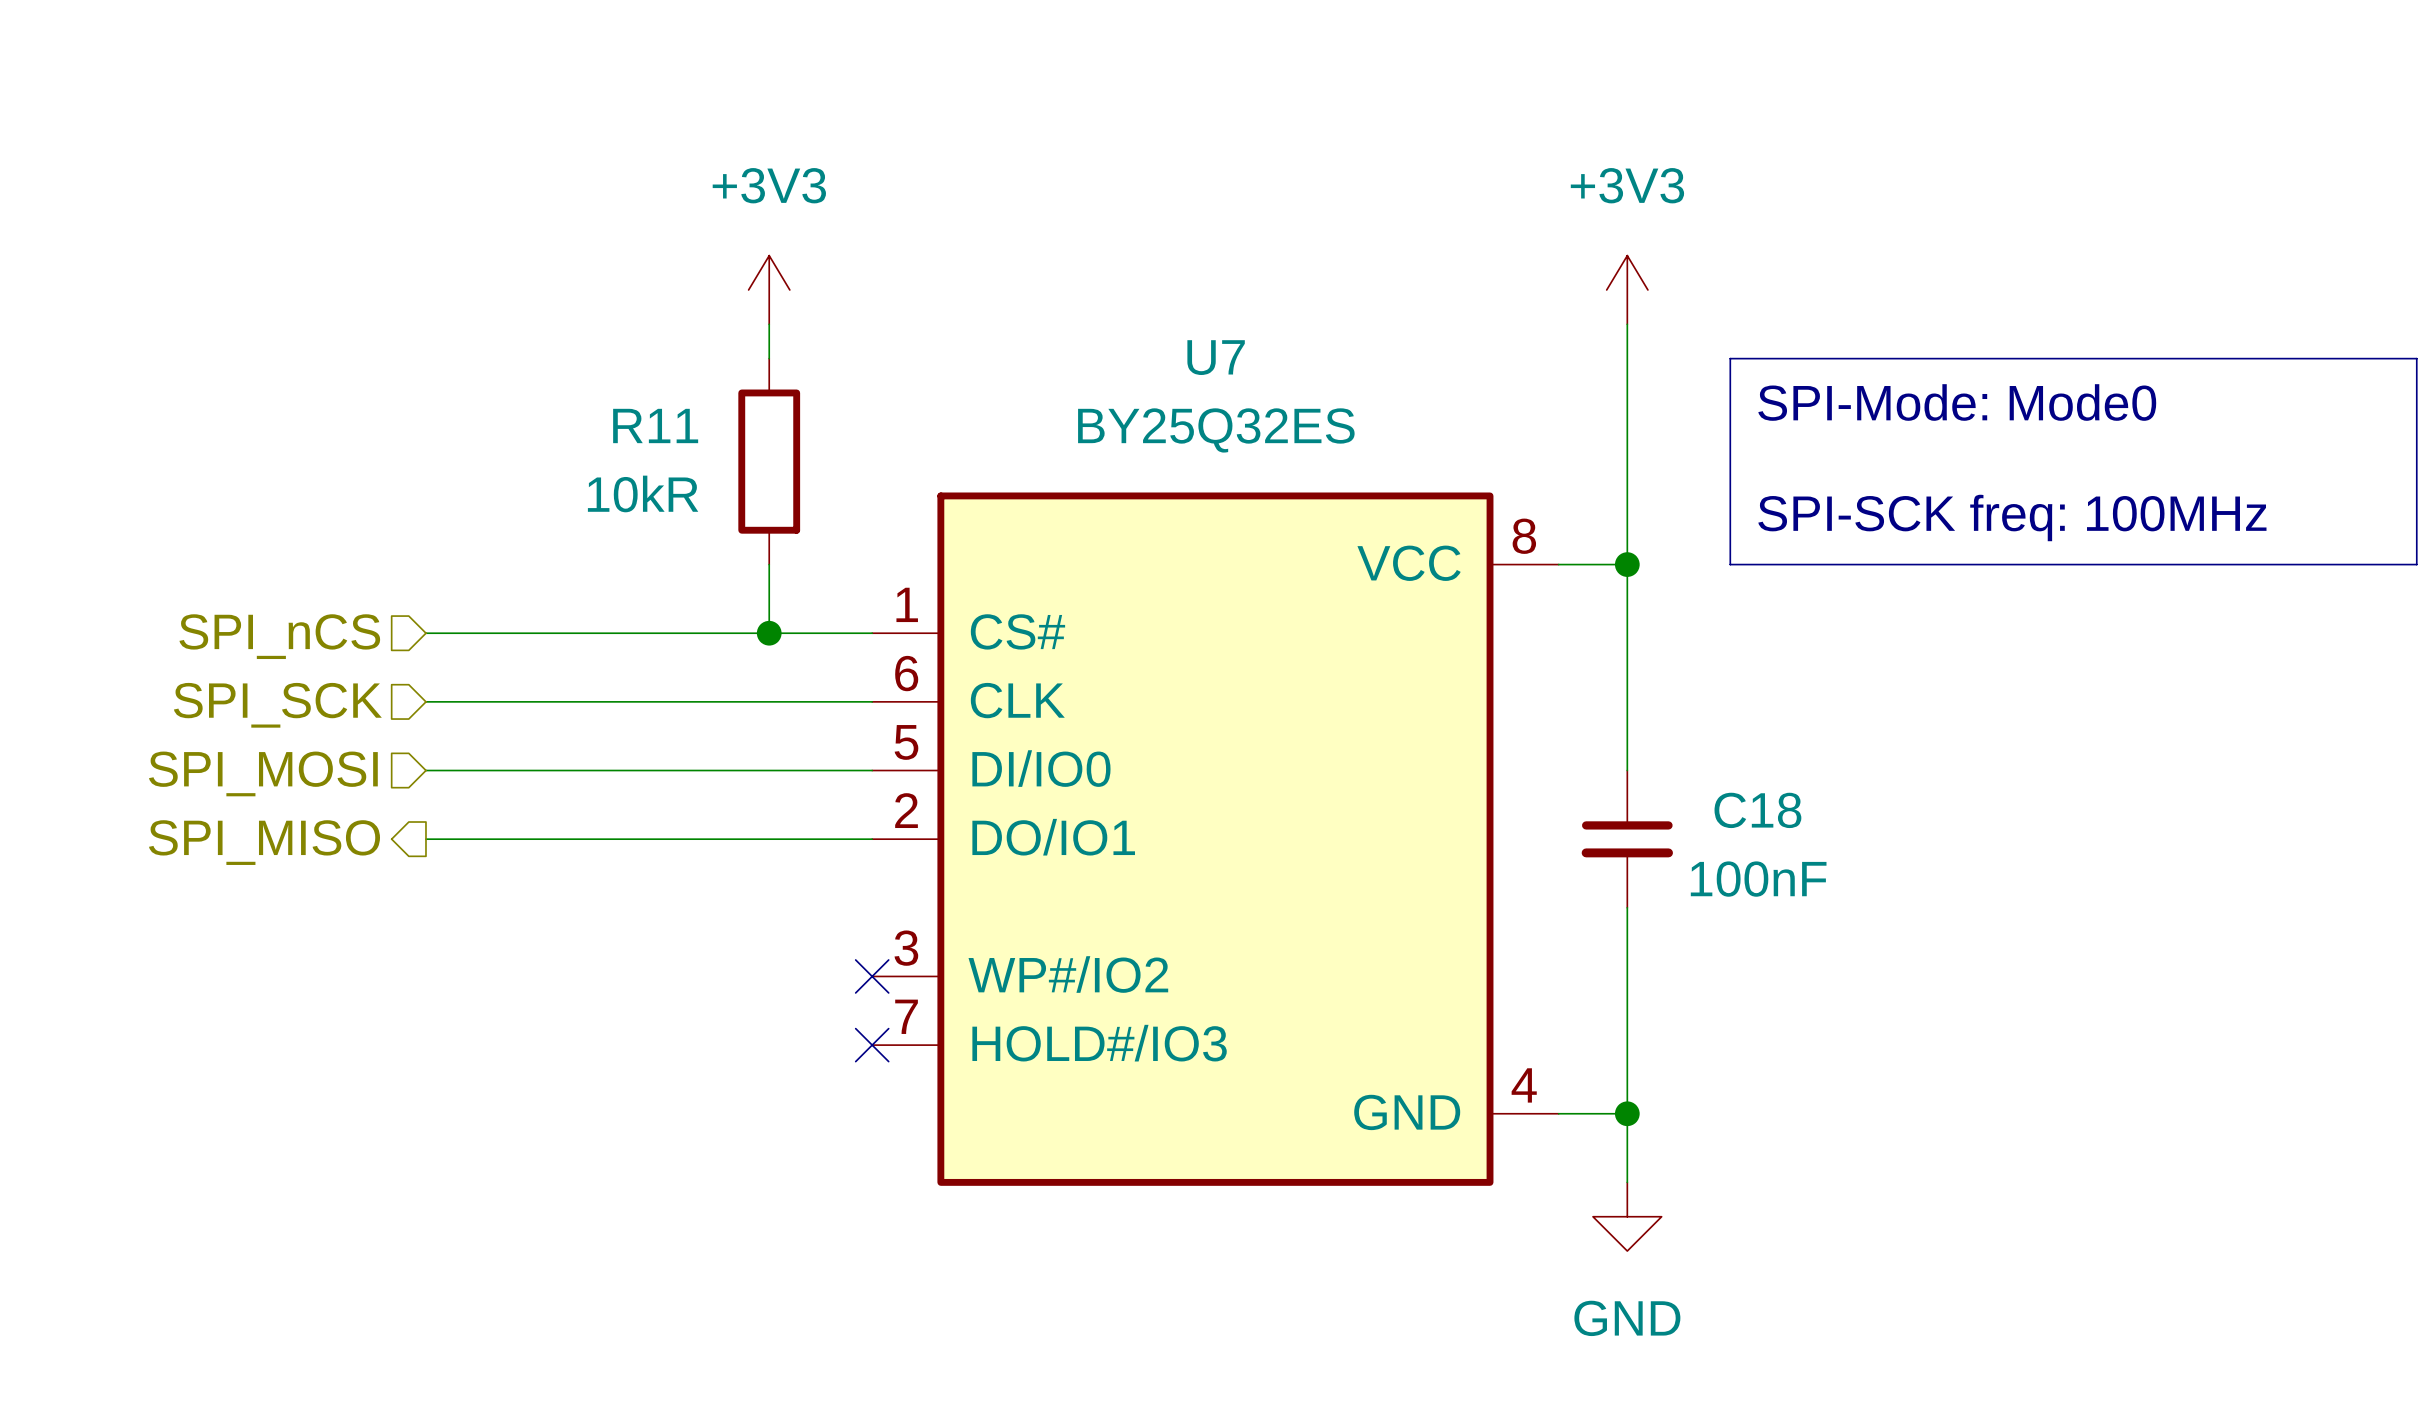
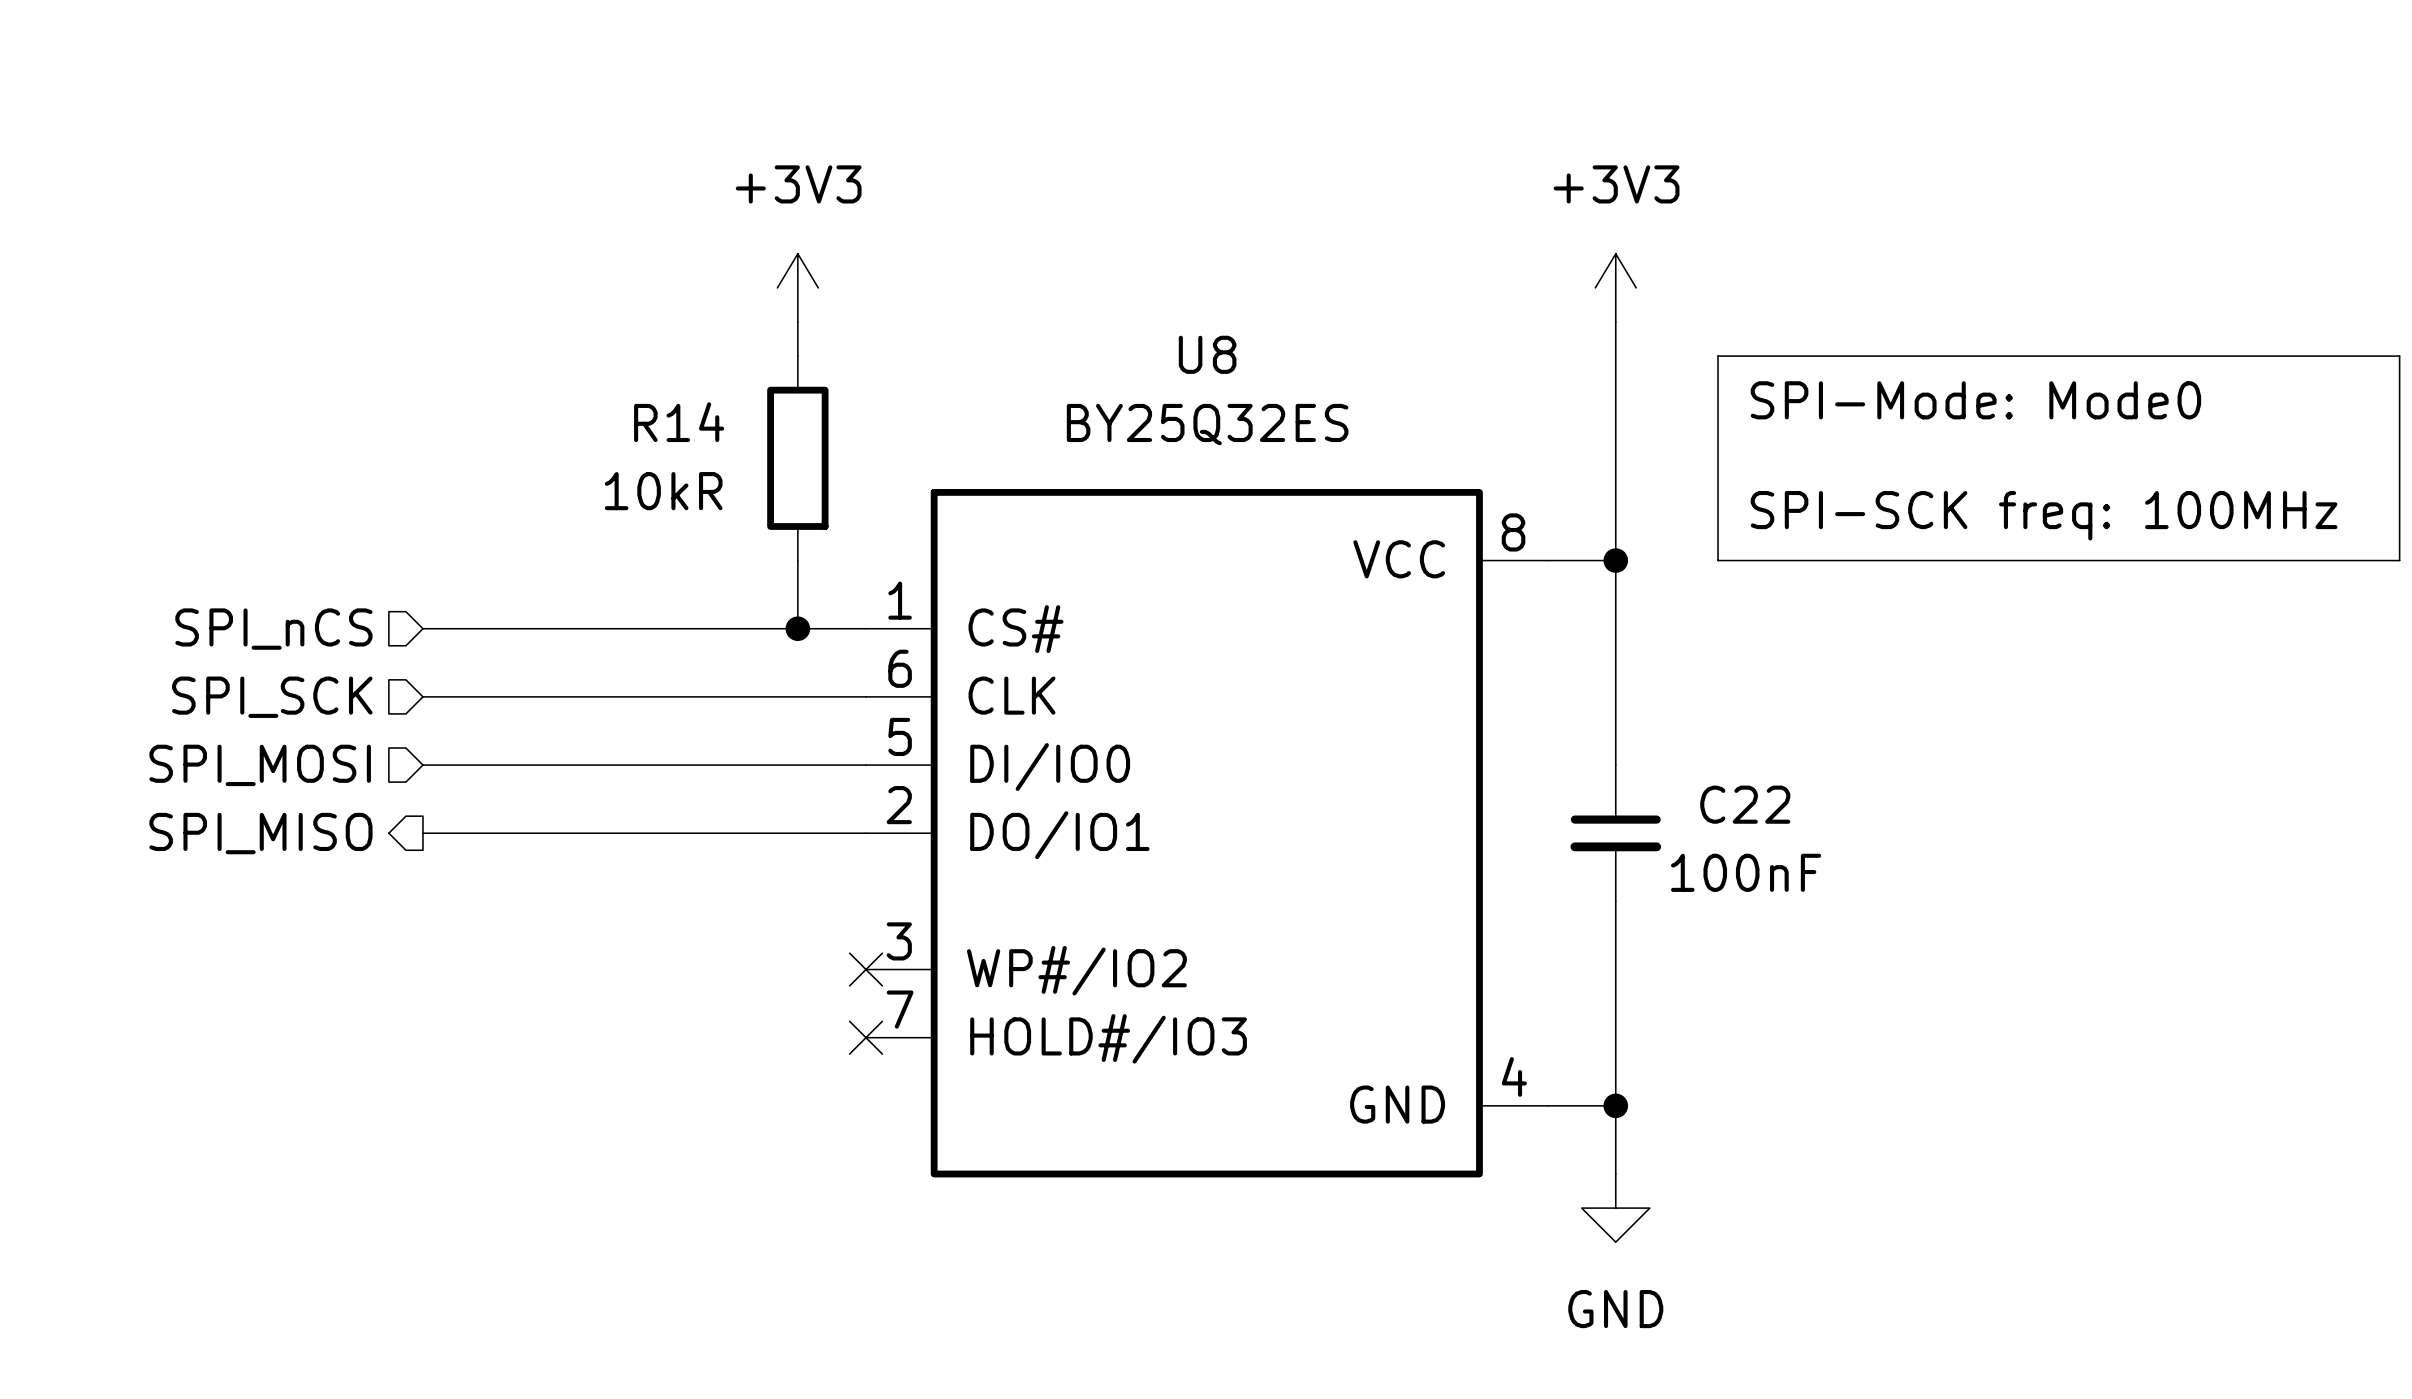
power symbol position: +3V3 (769, 289) -> +3V3 (797, 287)
wire: (769, 324) (769, 358) -> (797, 322) (797, 356)
U7 name: U7 (1216, 357) -> U8 (1207, 354)
R11: 10kR (769, 461) -> none
R14: none -> 10kR (797, 458)
wire: (769, 564) (769, 633) -> (797, 560) (797, 628)
junction position: (769, 633) -> (797, 628)
C18 name: C18 (1757, 810) -> C22 (1745, 804)

